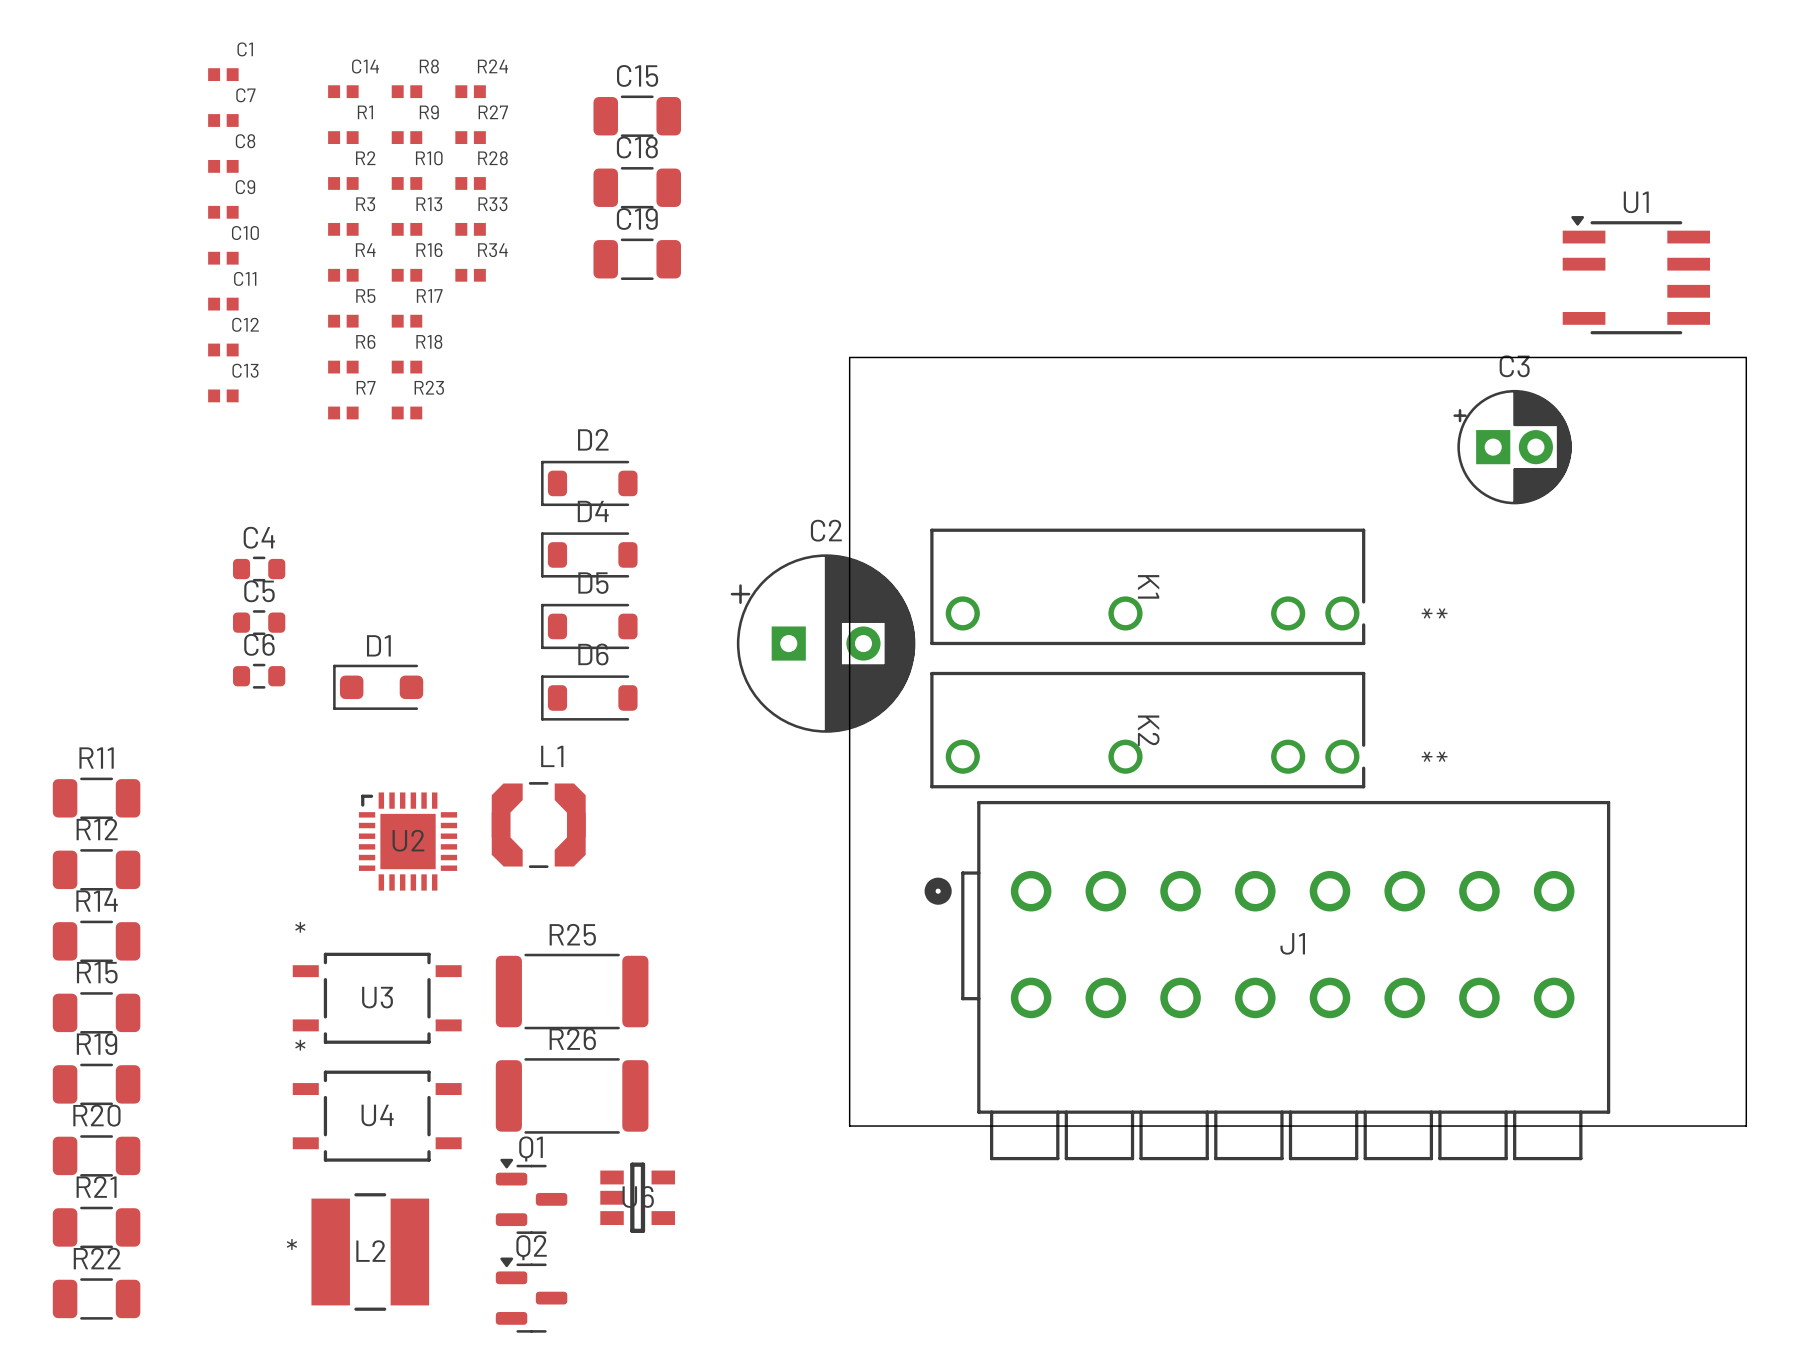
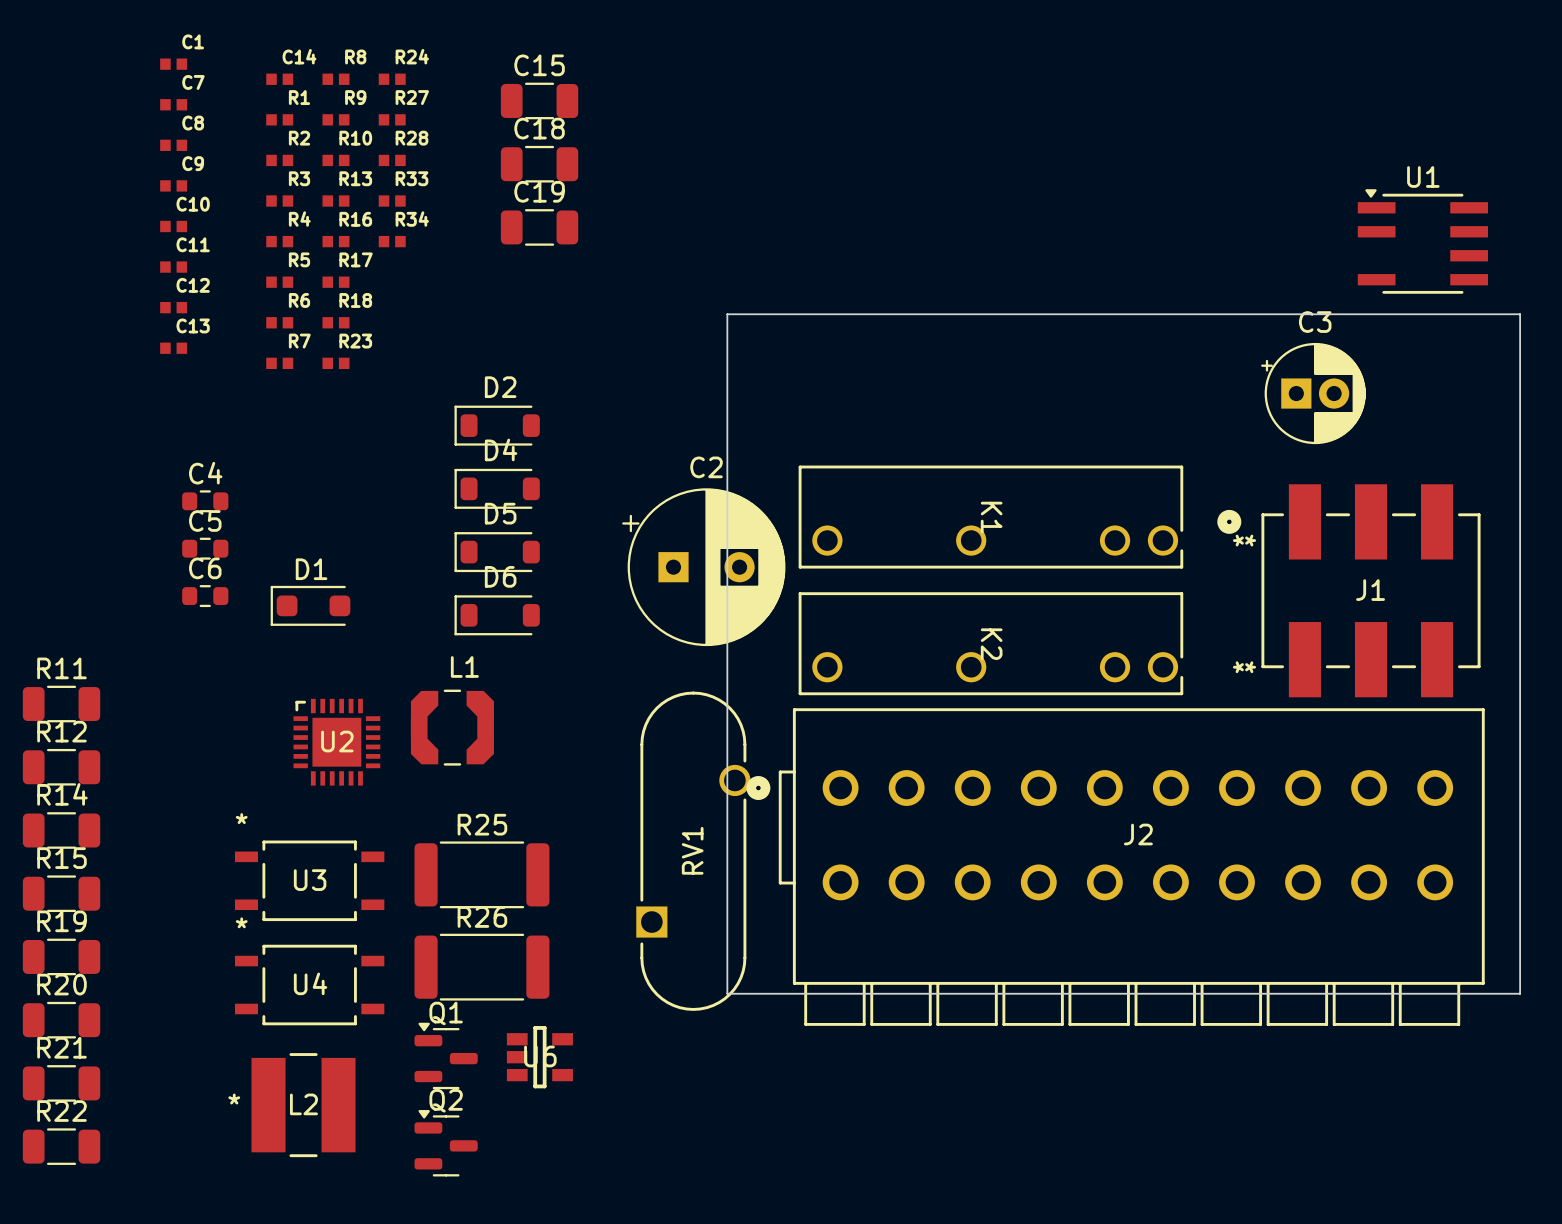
J1 footprint: [924, 800, 1611, 1161] -> [1217, 484, 1481, 698]
RV1: none -> (693, 851)
J2: none -> (1115, 867)

